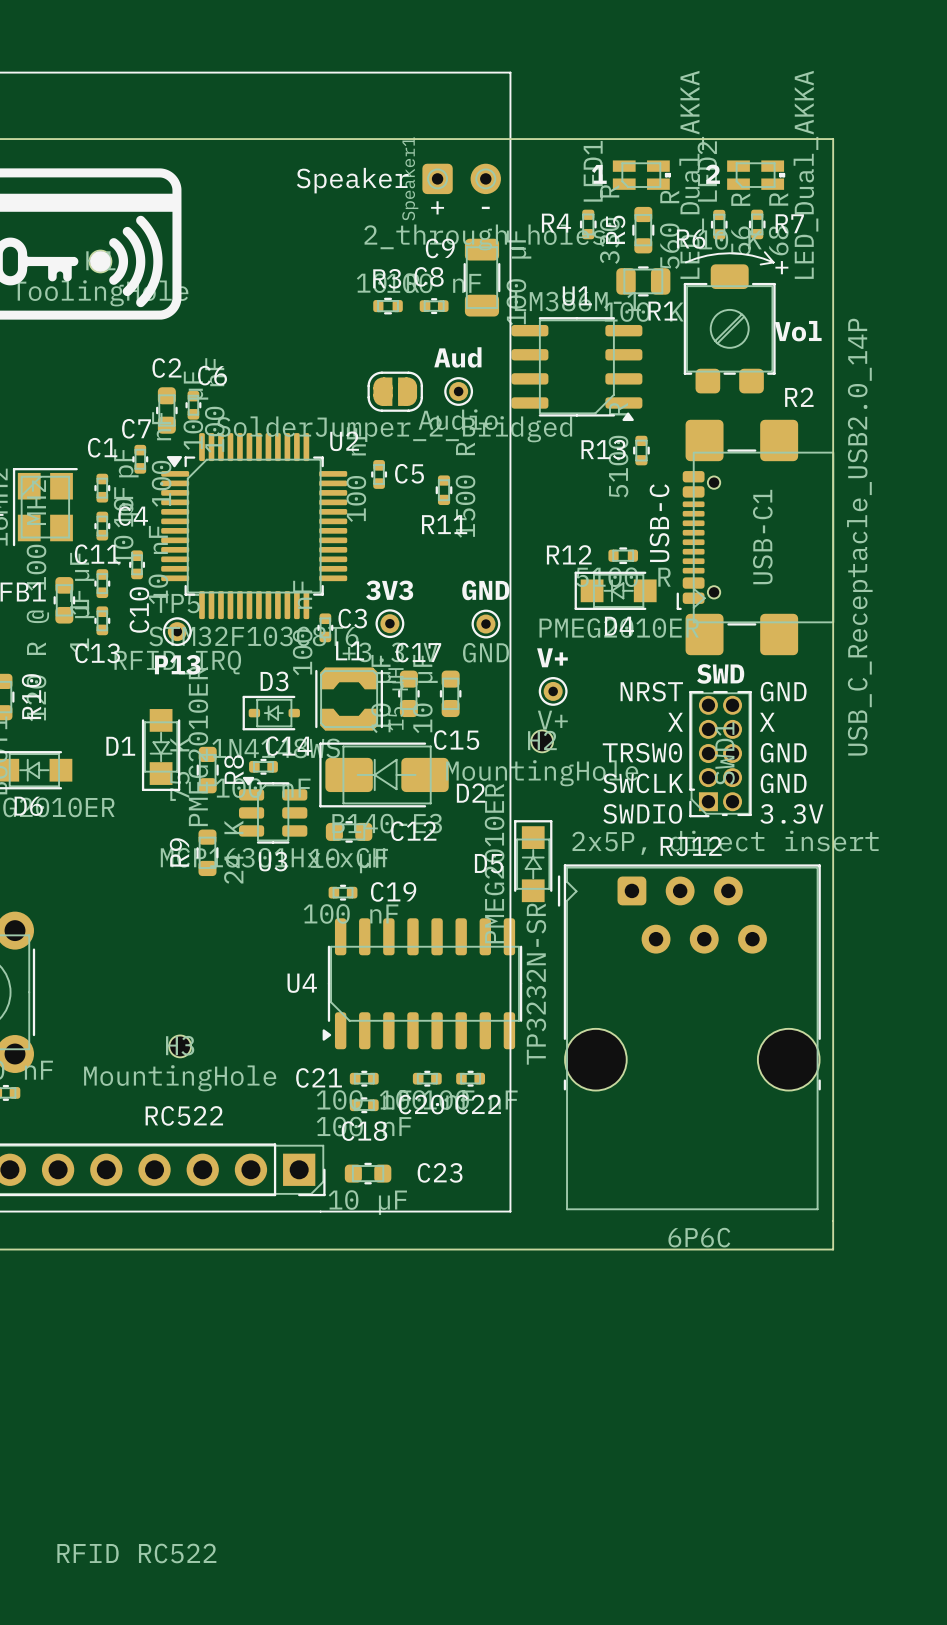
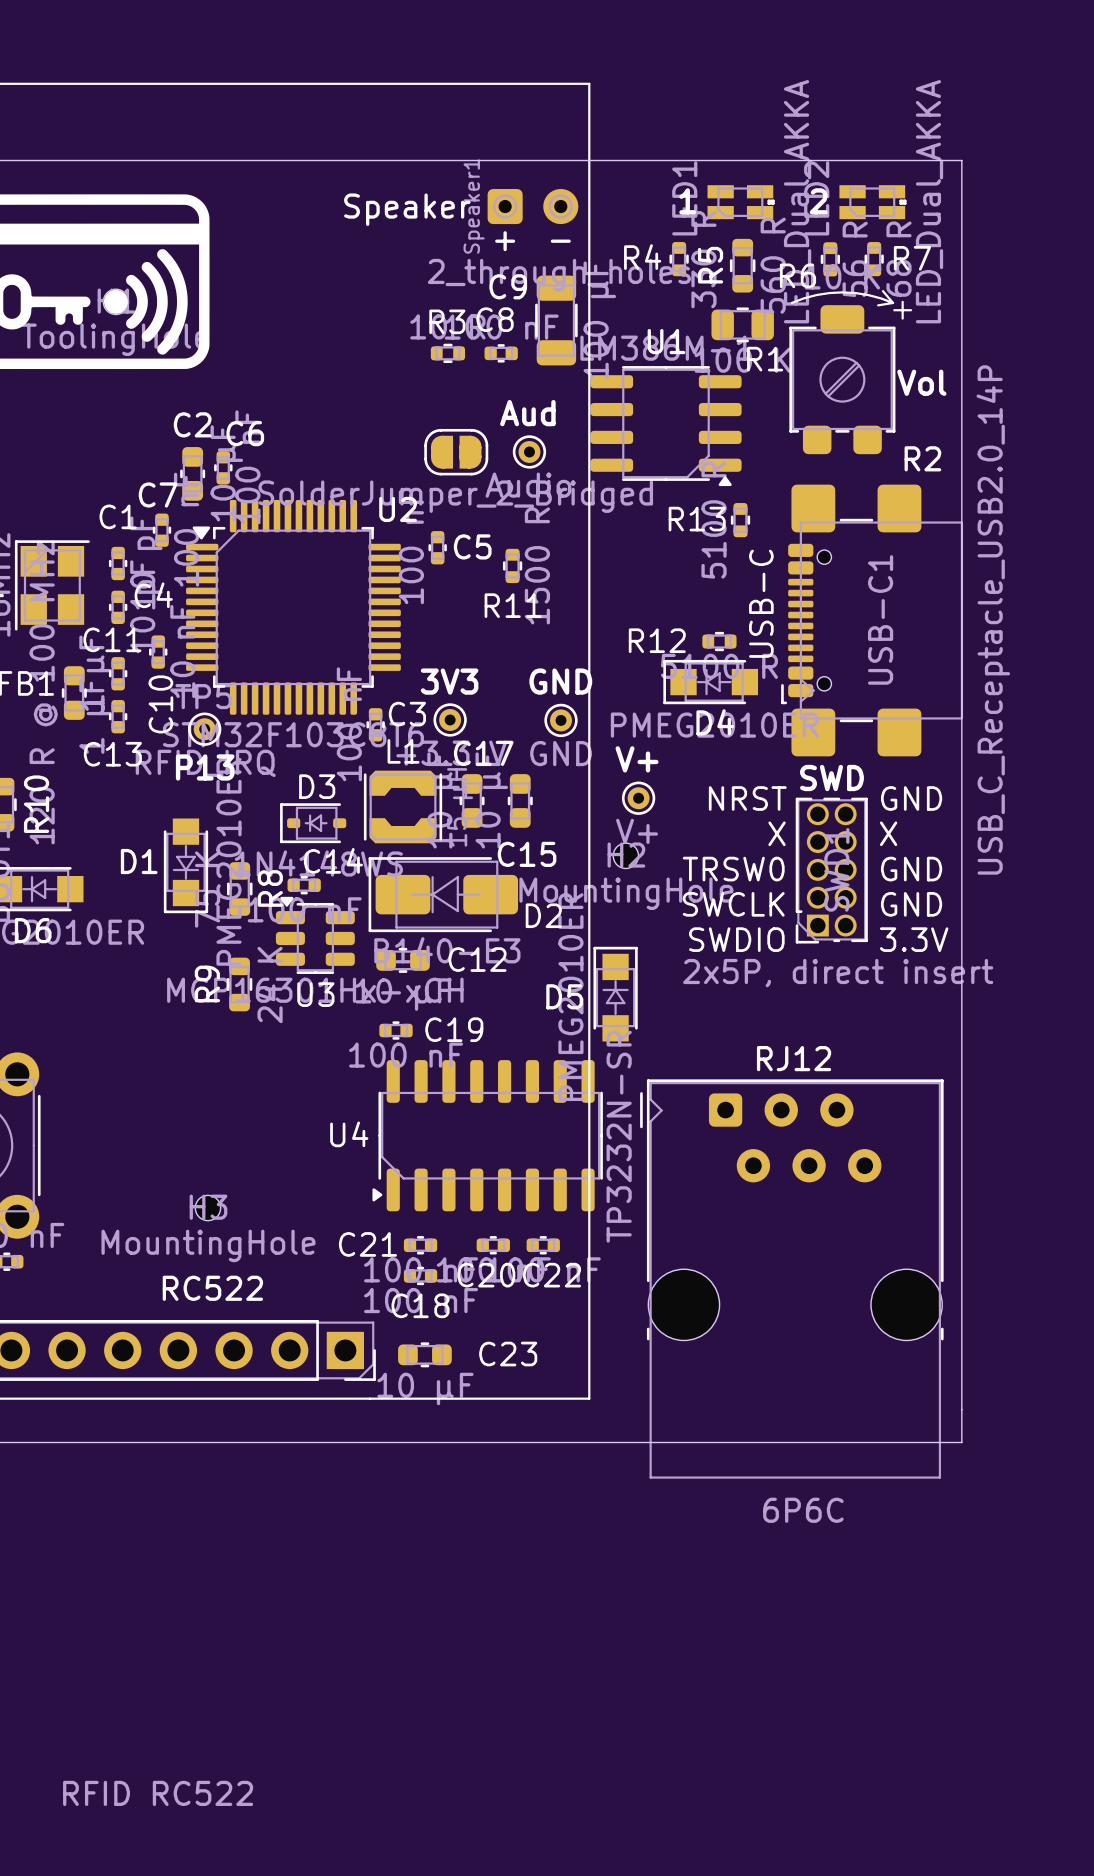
RJ12 position: (689, 1037) -> (791, 1279)

